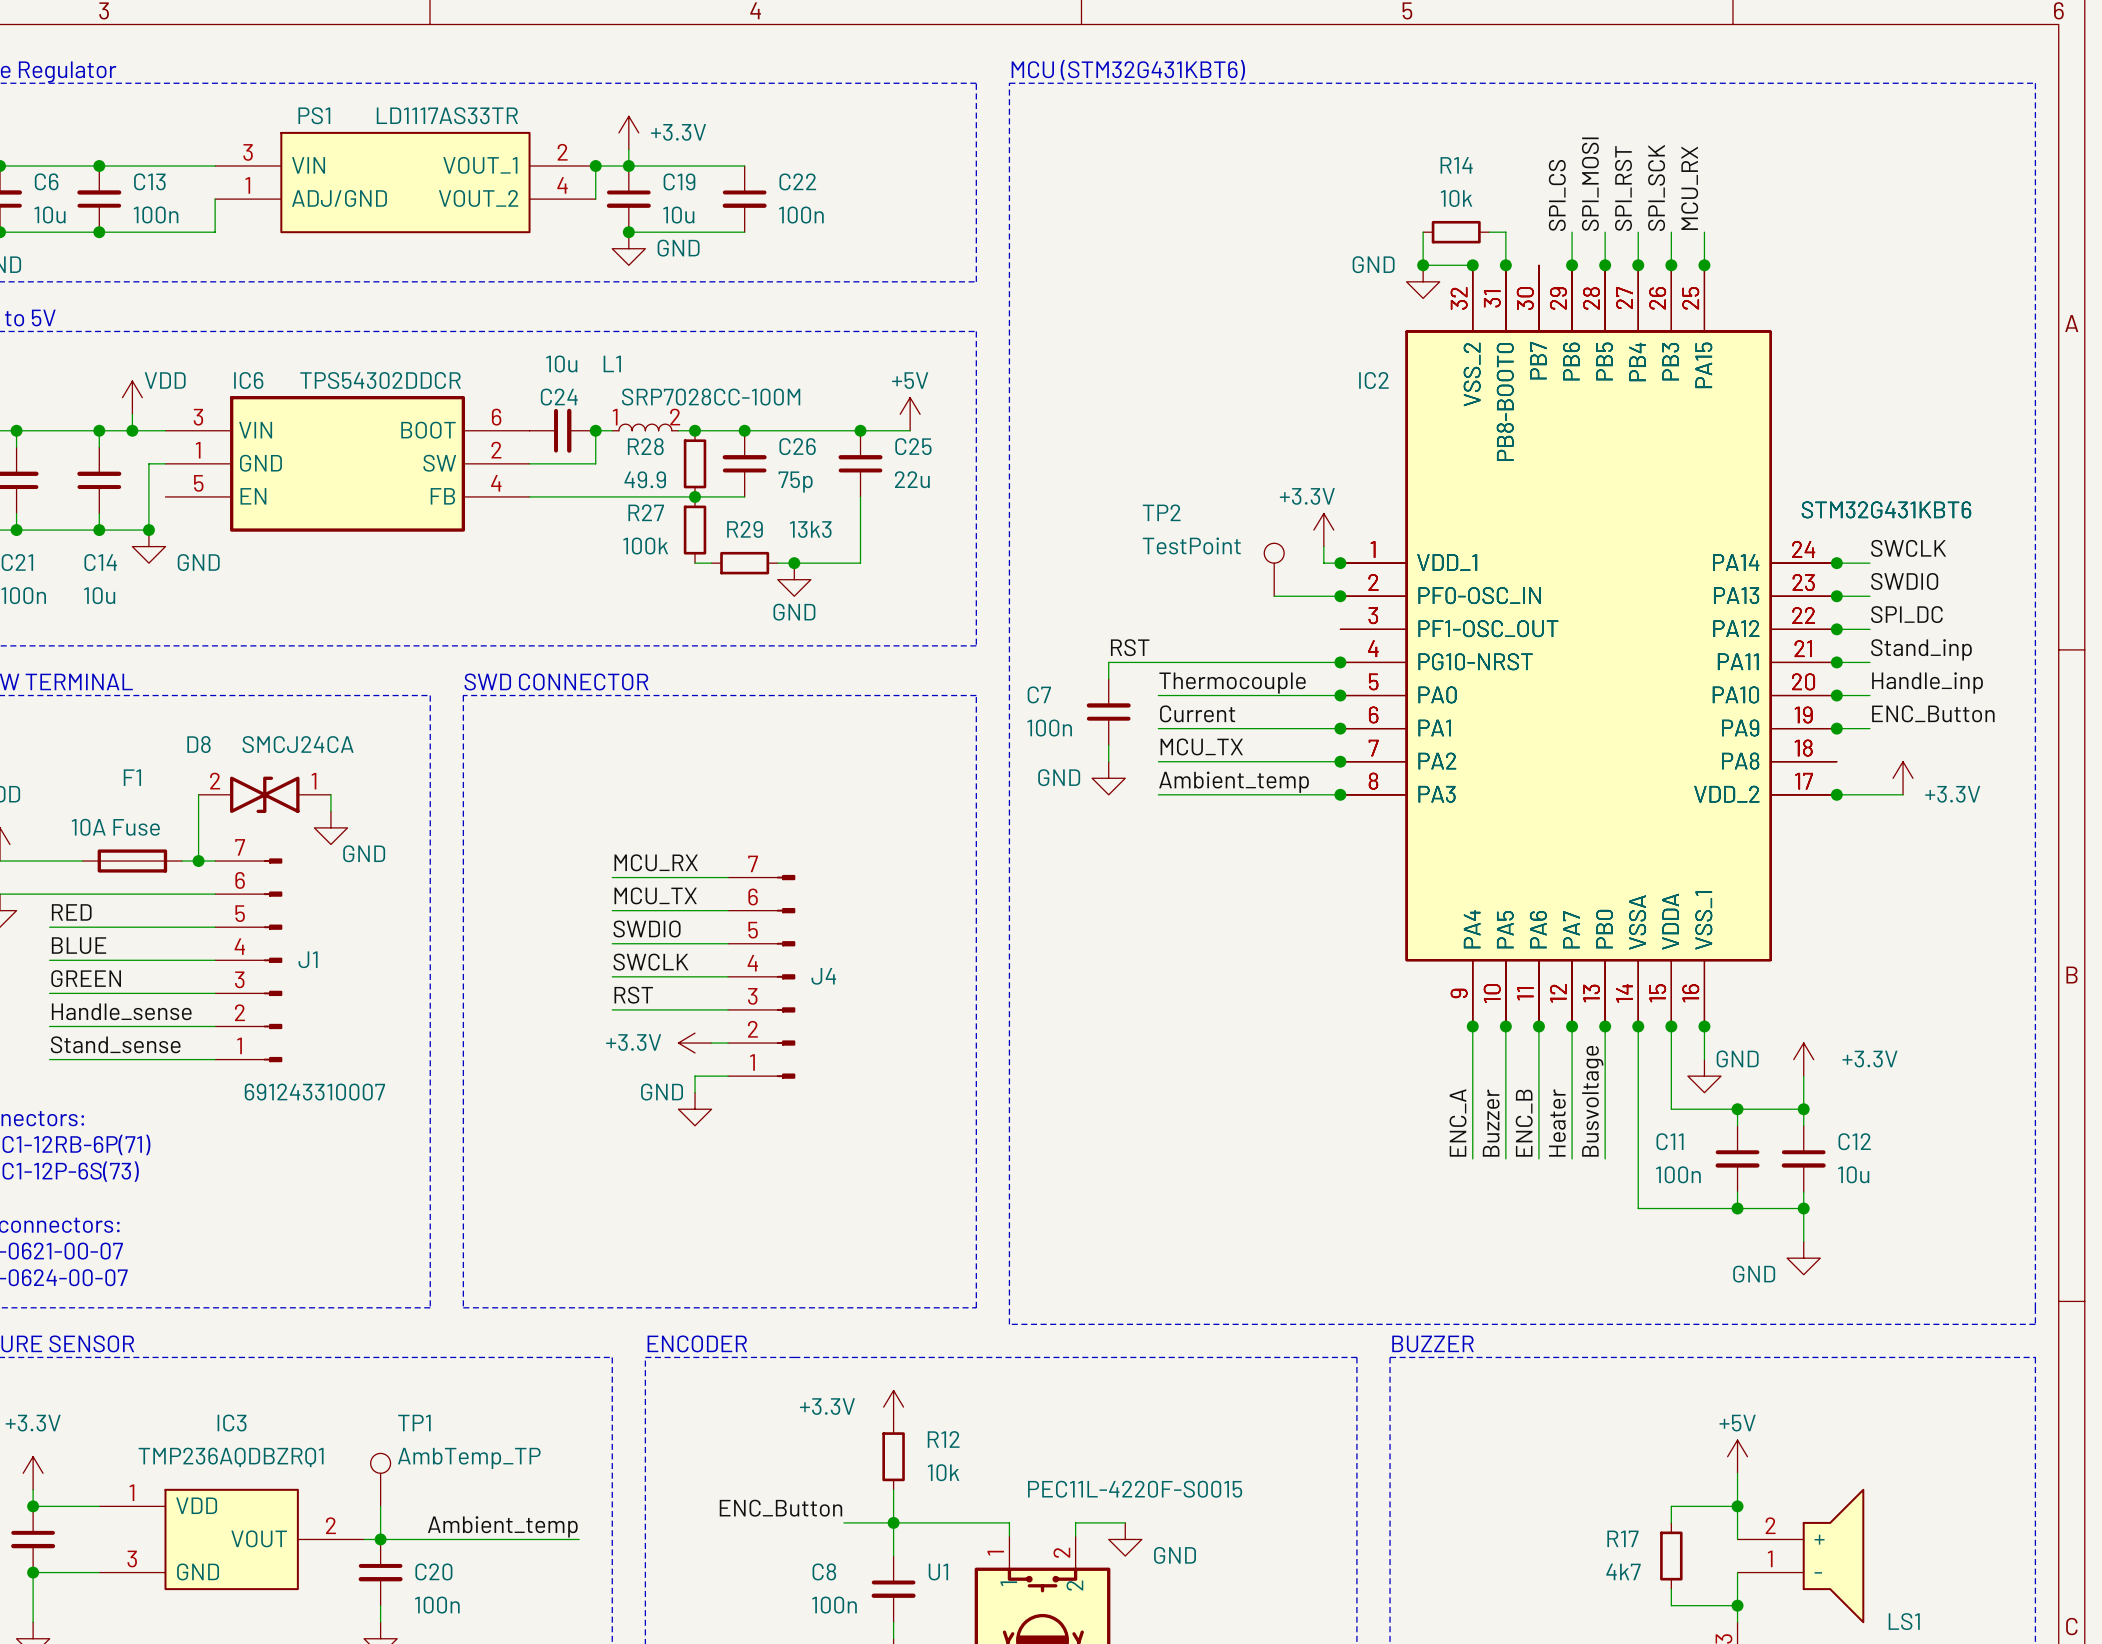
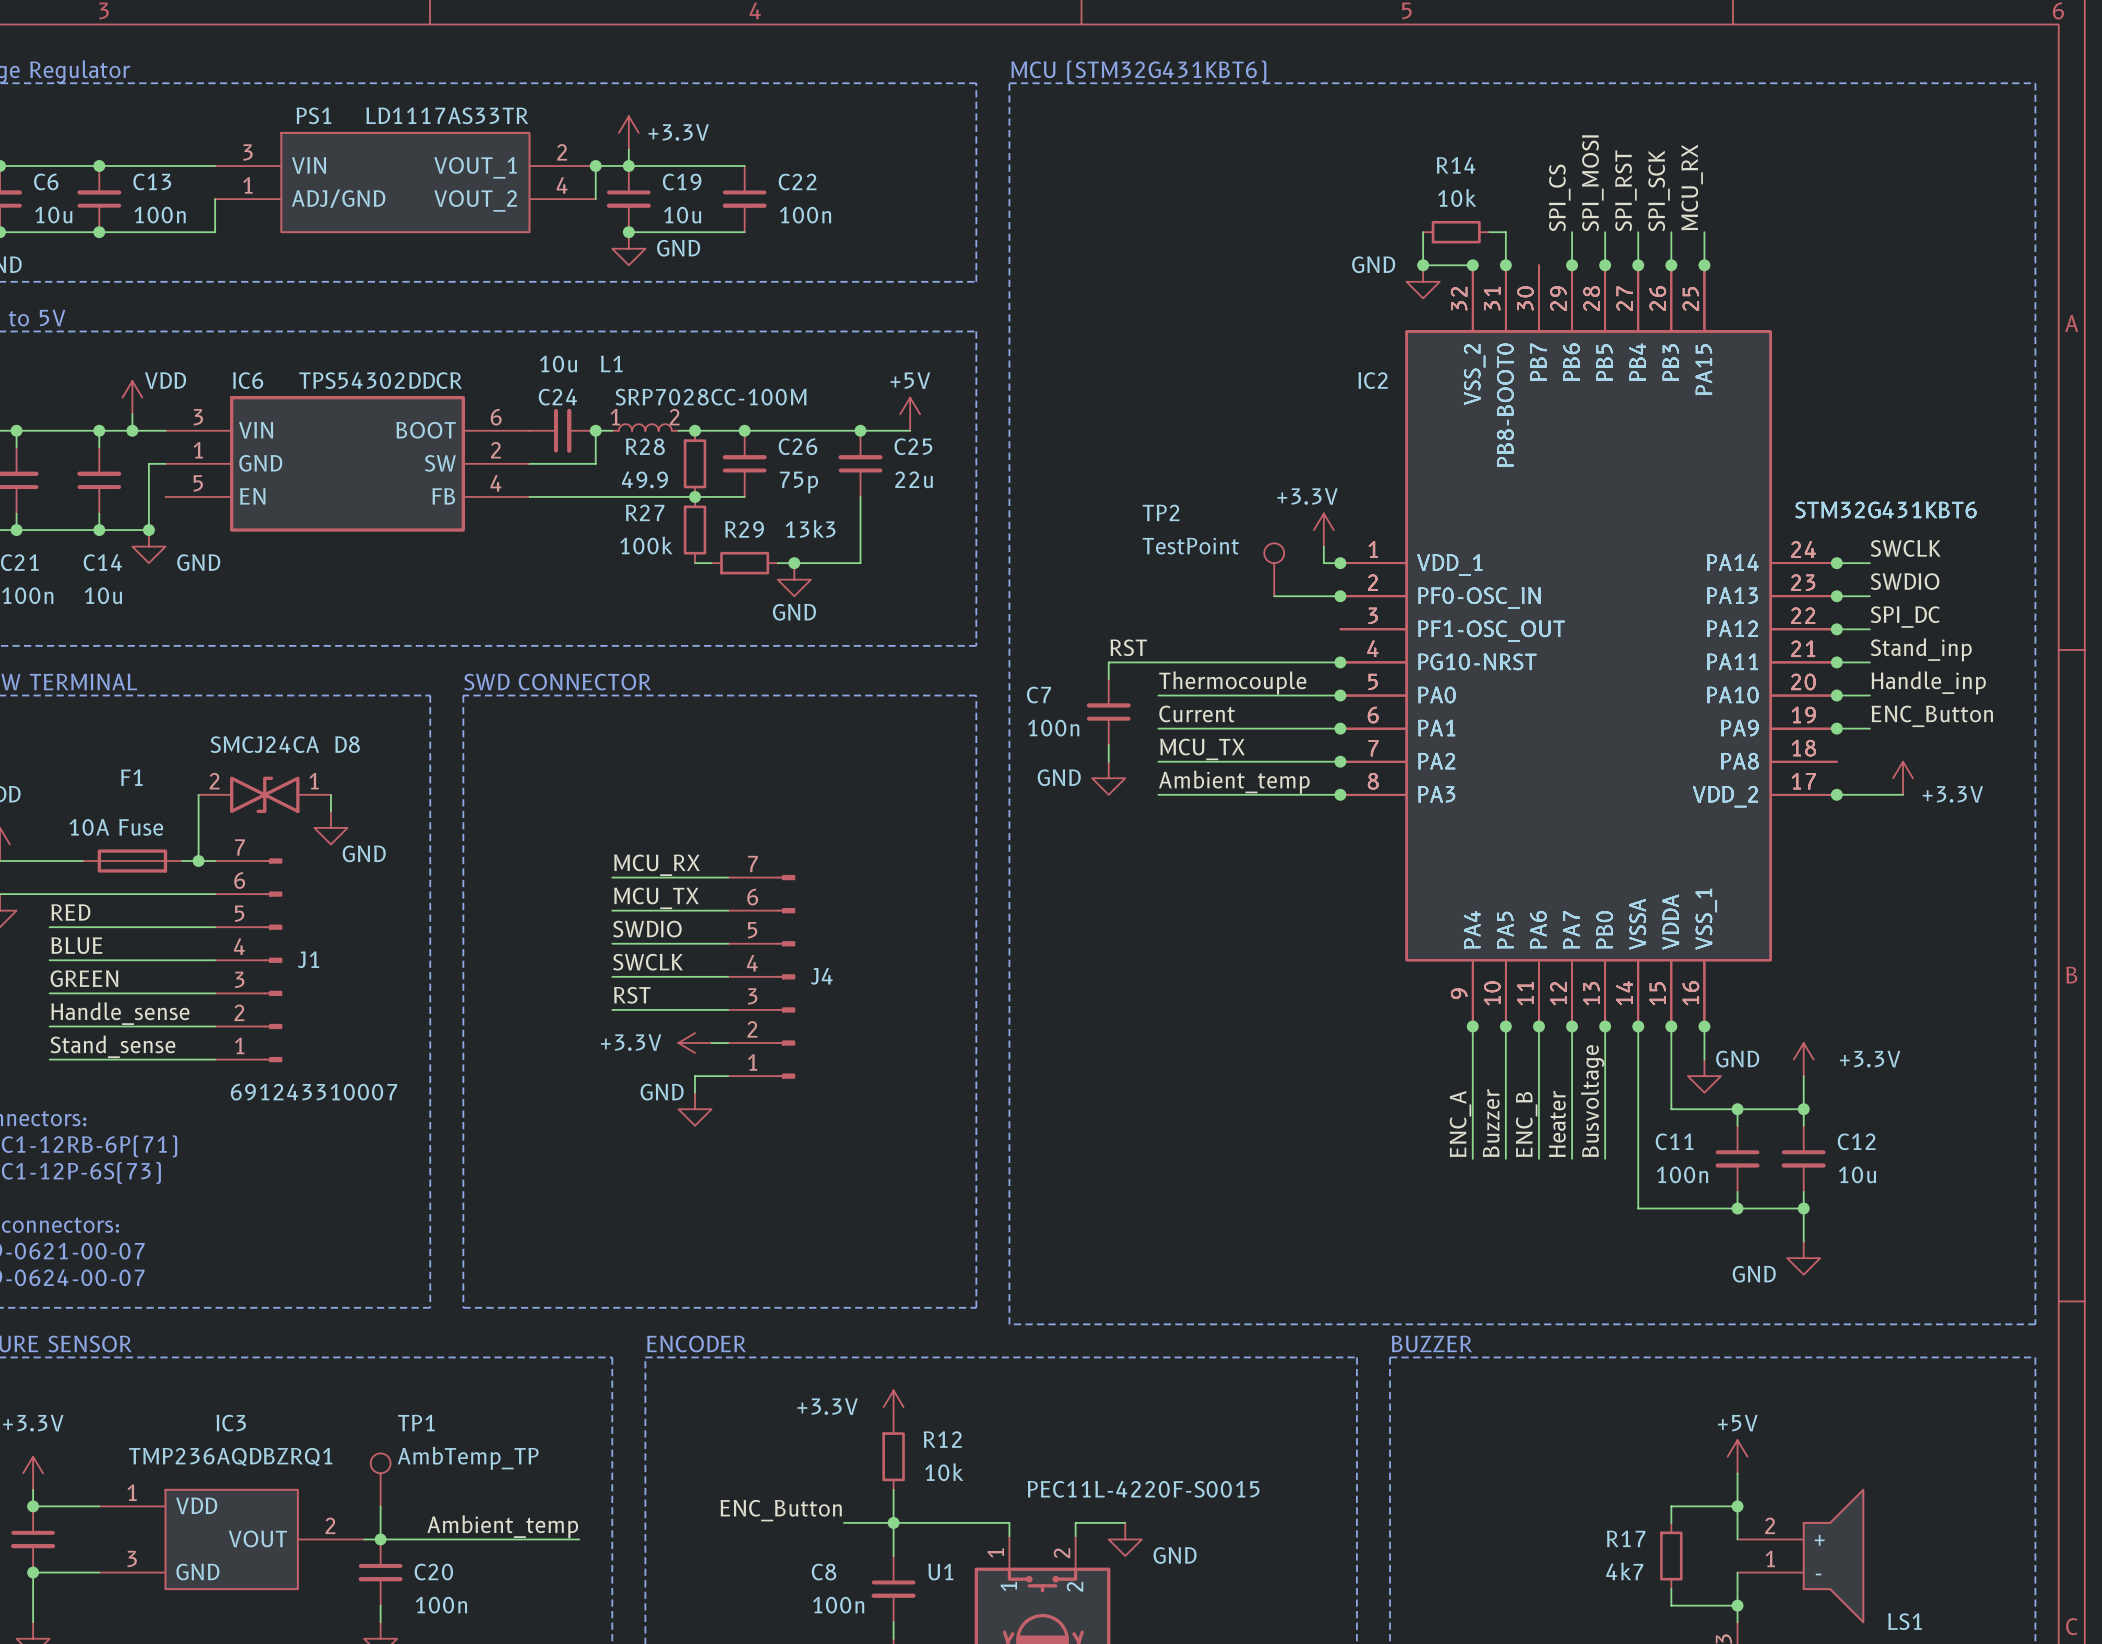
D8 name position: D8 (198, 744) -> D8 (347, 744)
D8 value position: SMCJ24CA (298, 744) -> SMCJ24CA (264, 744)

